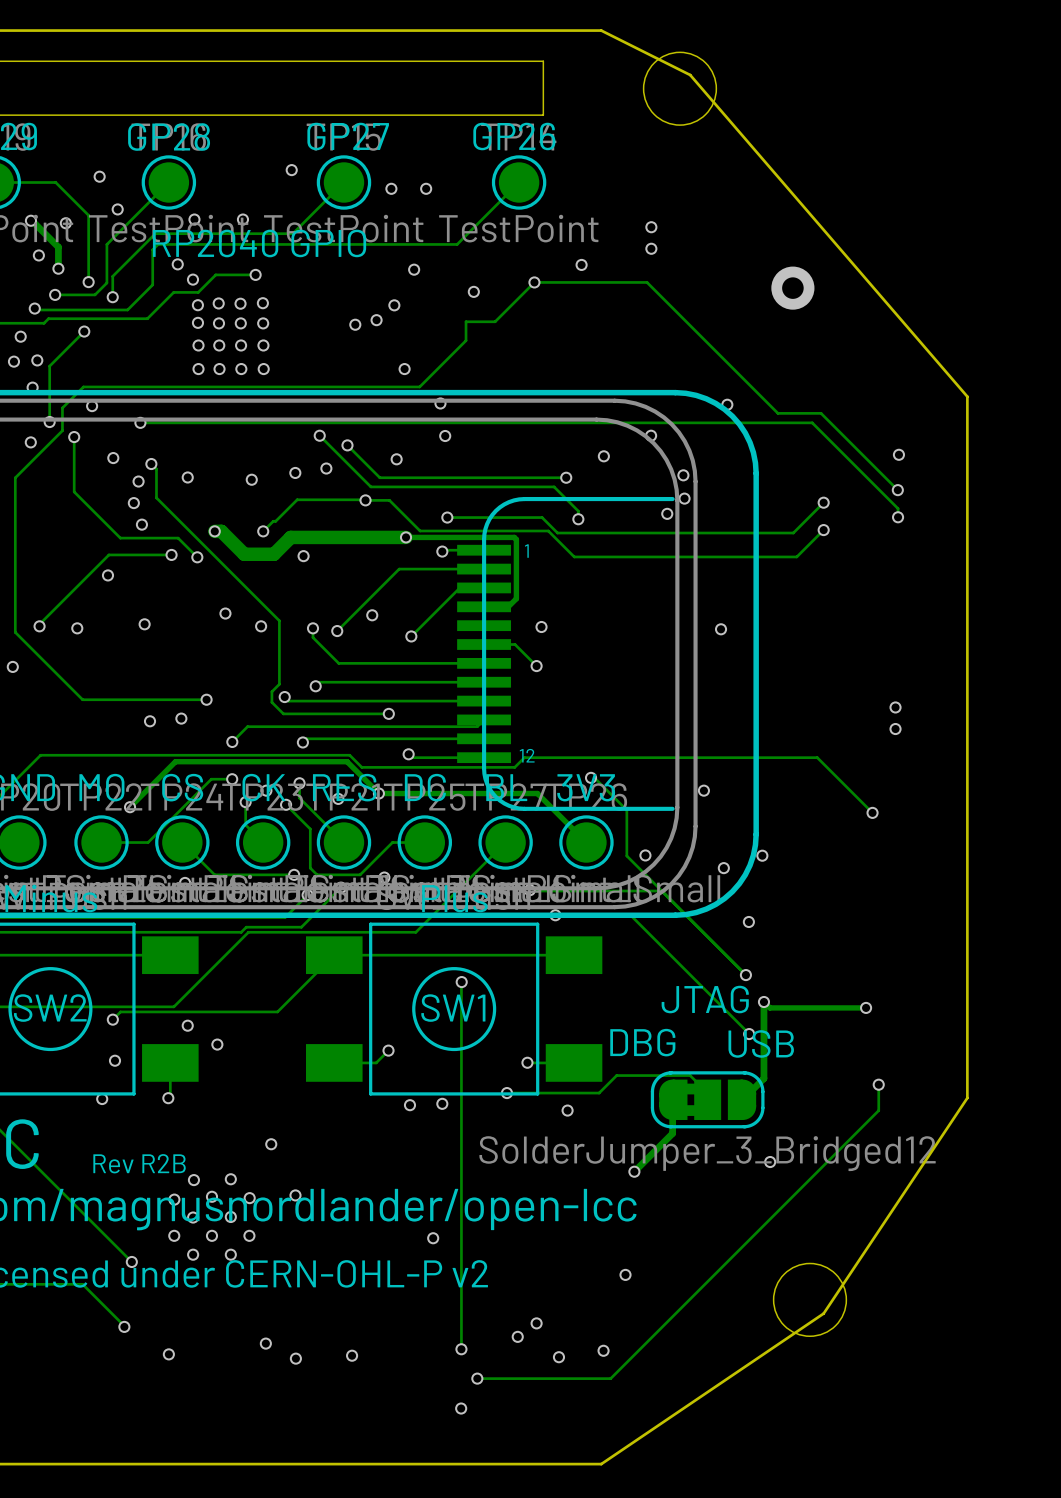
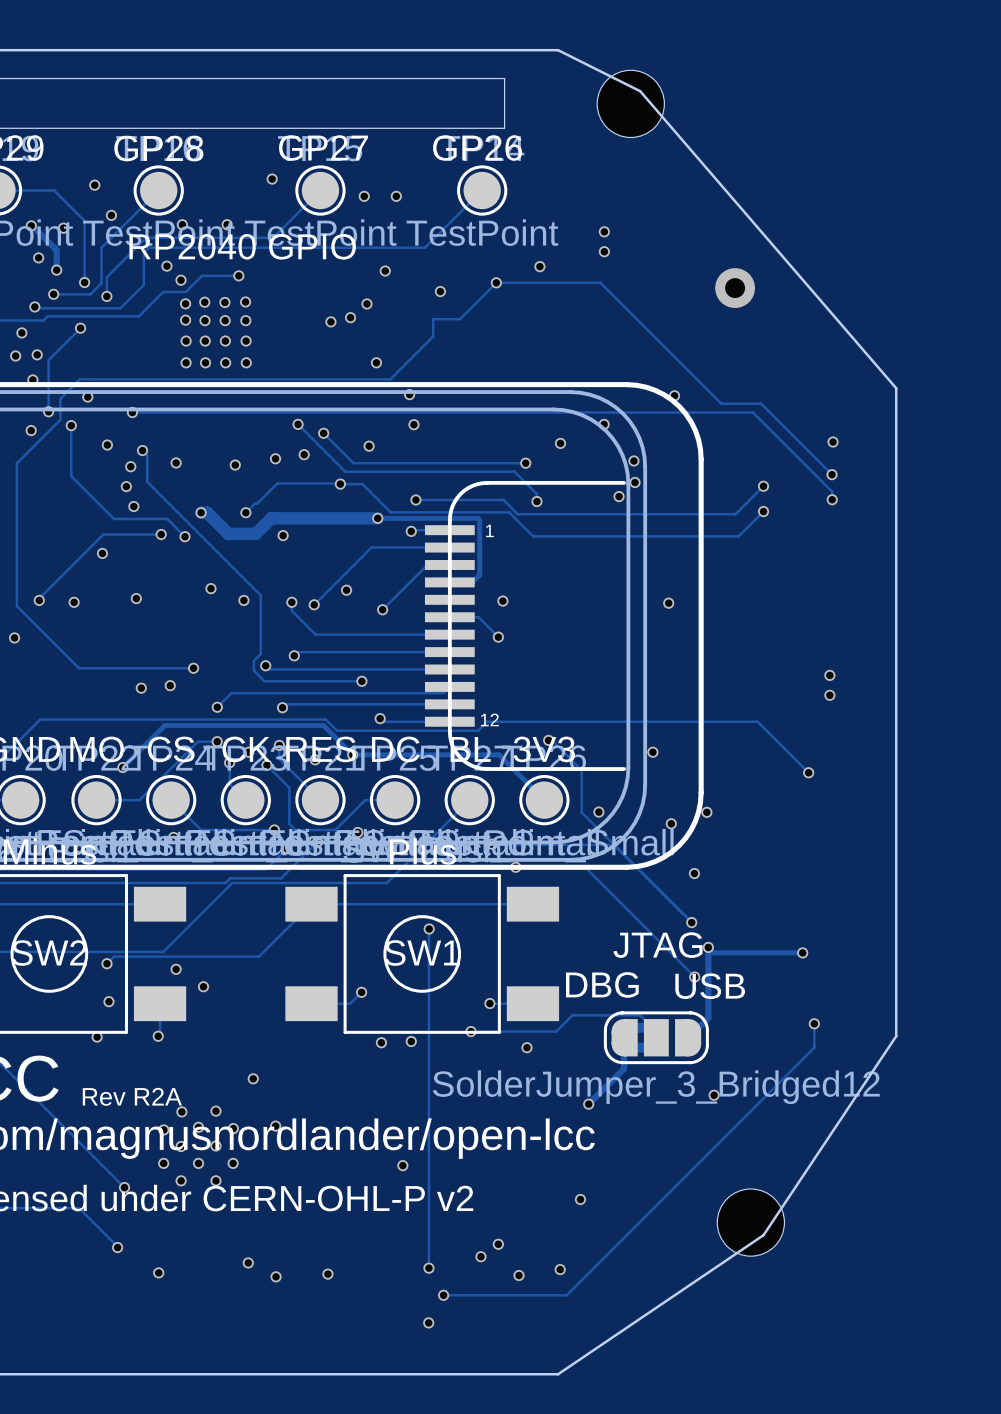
text: Rev R2B (139, 1163) -> Rev R2A (132, 1096)

